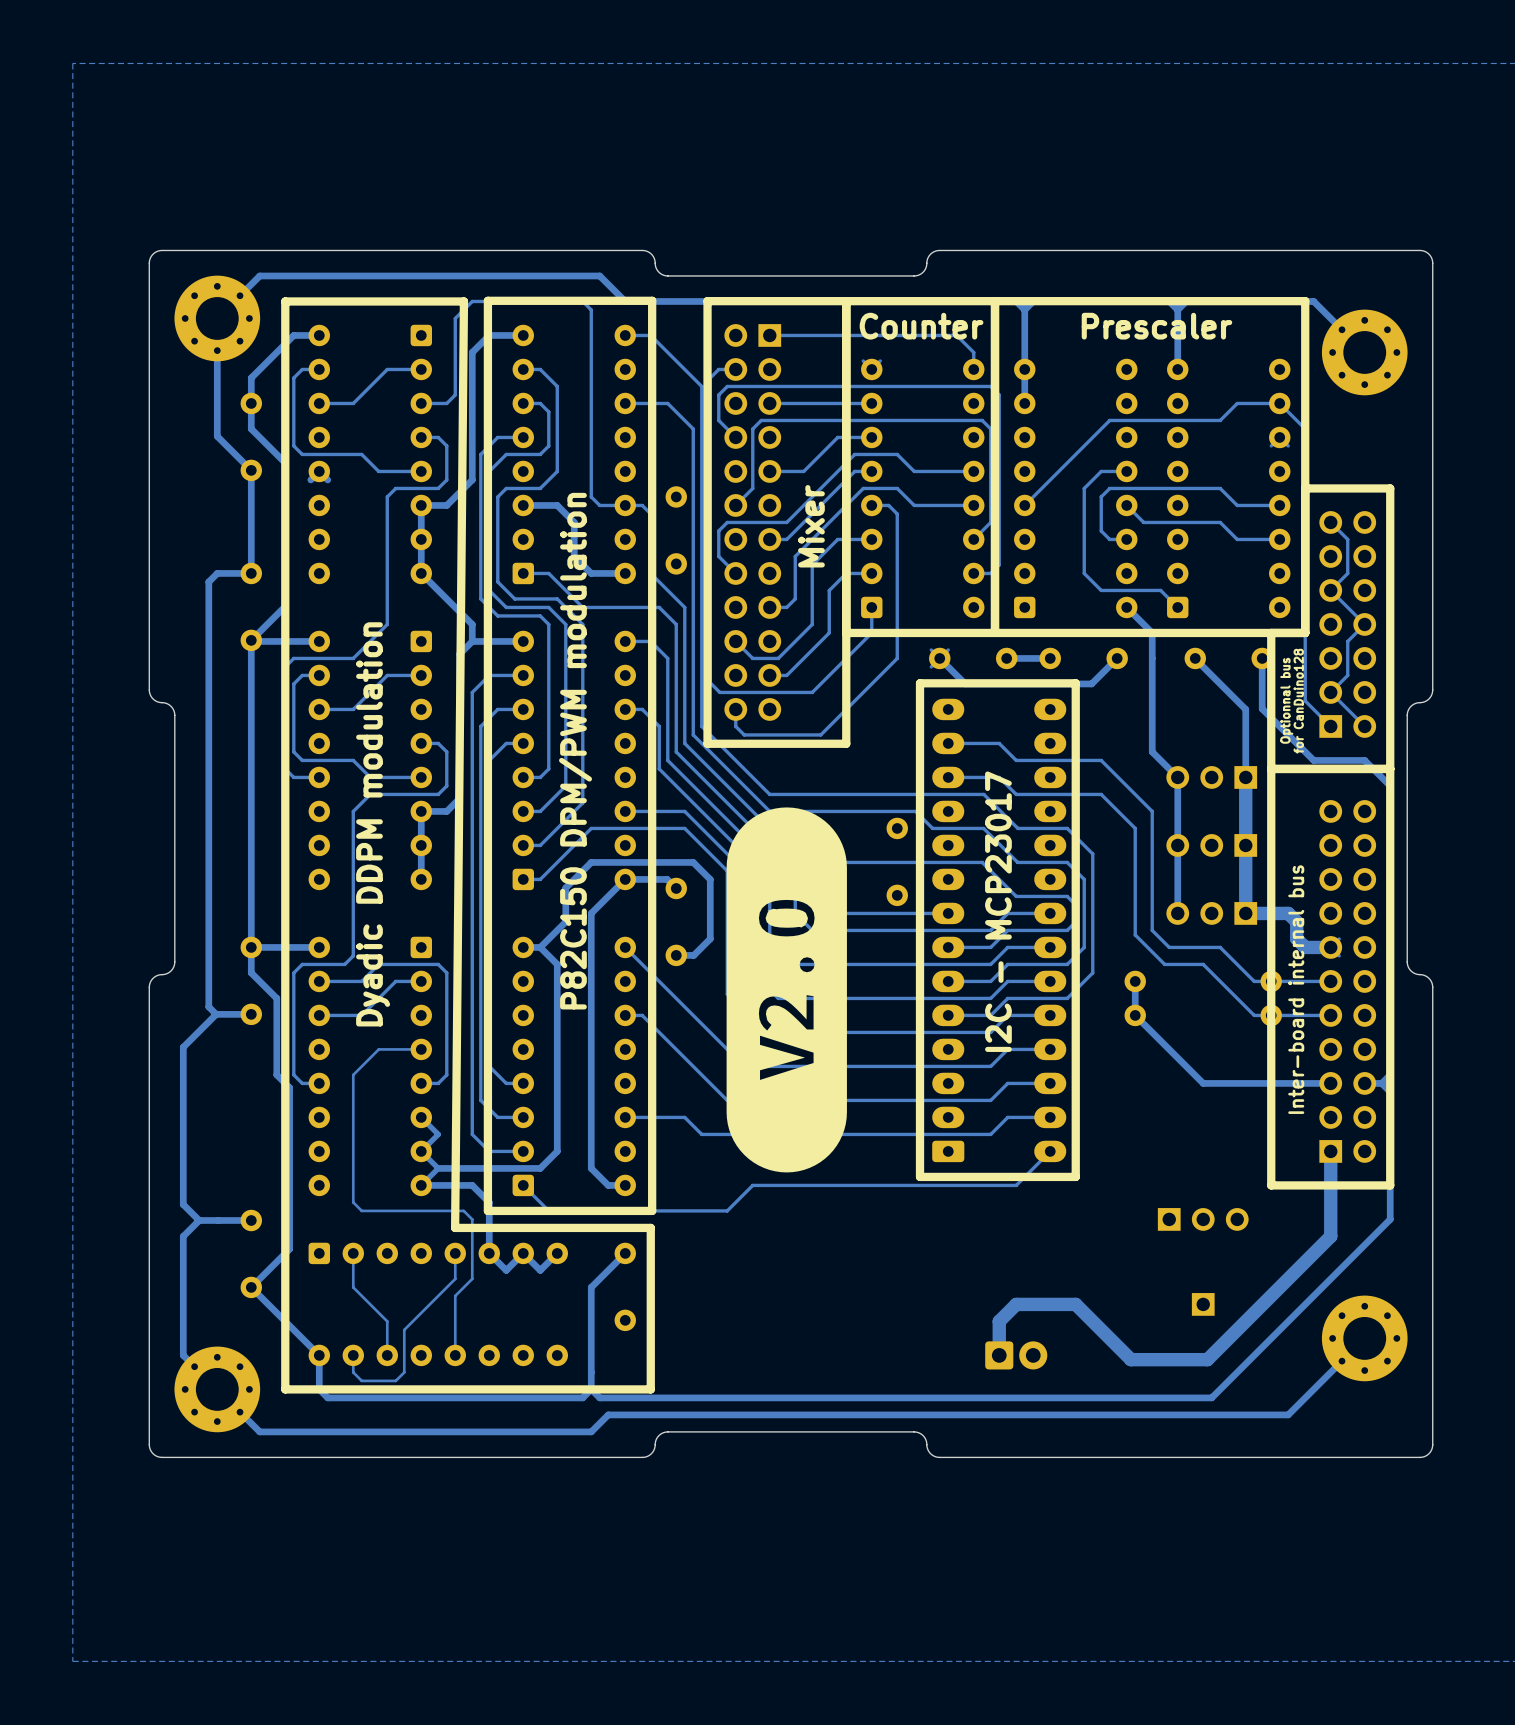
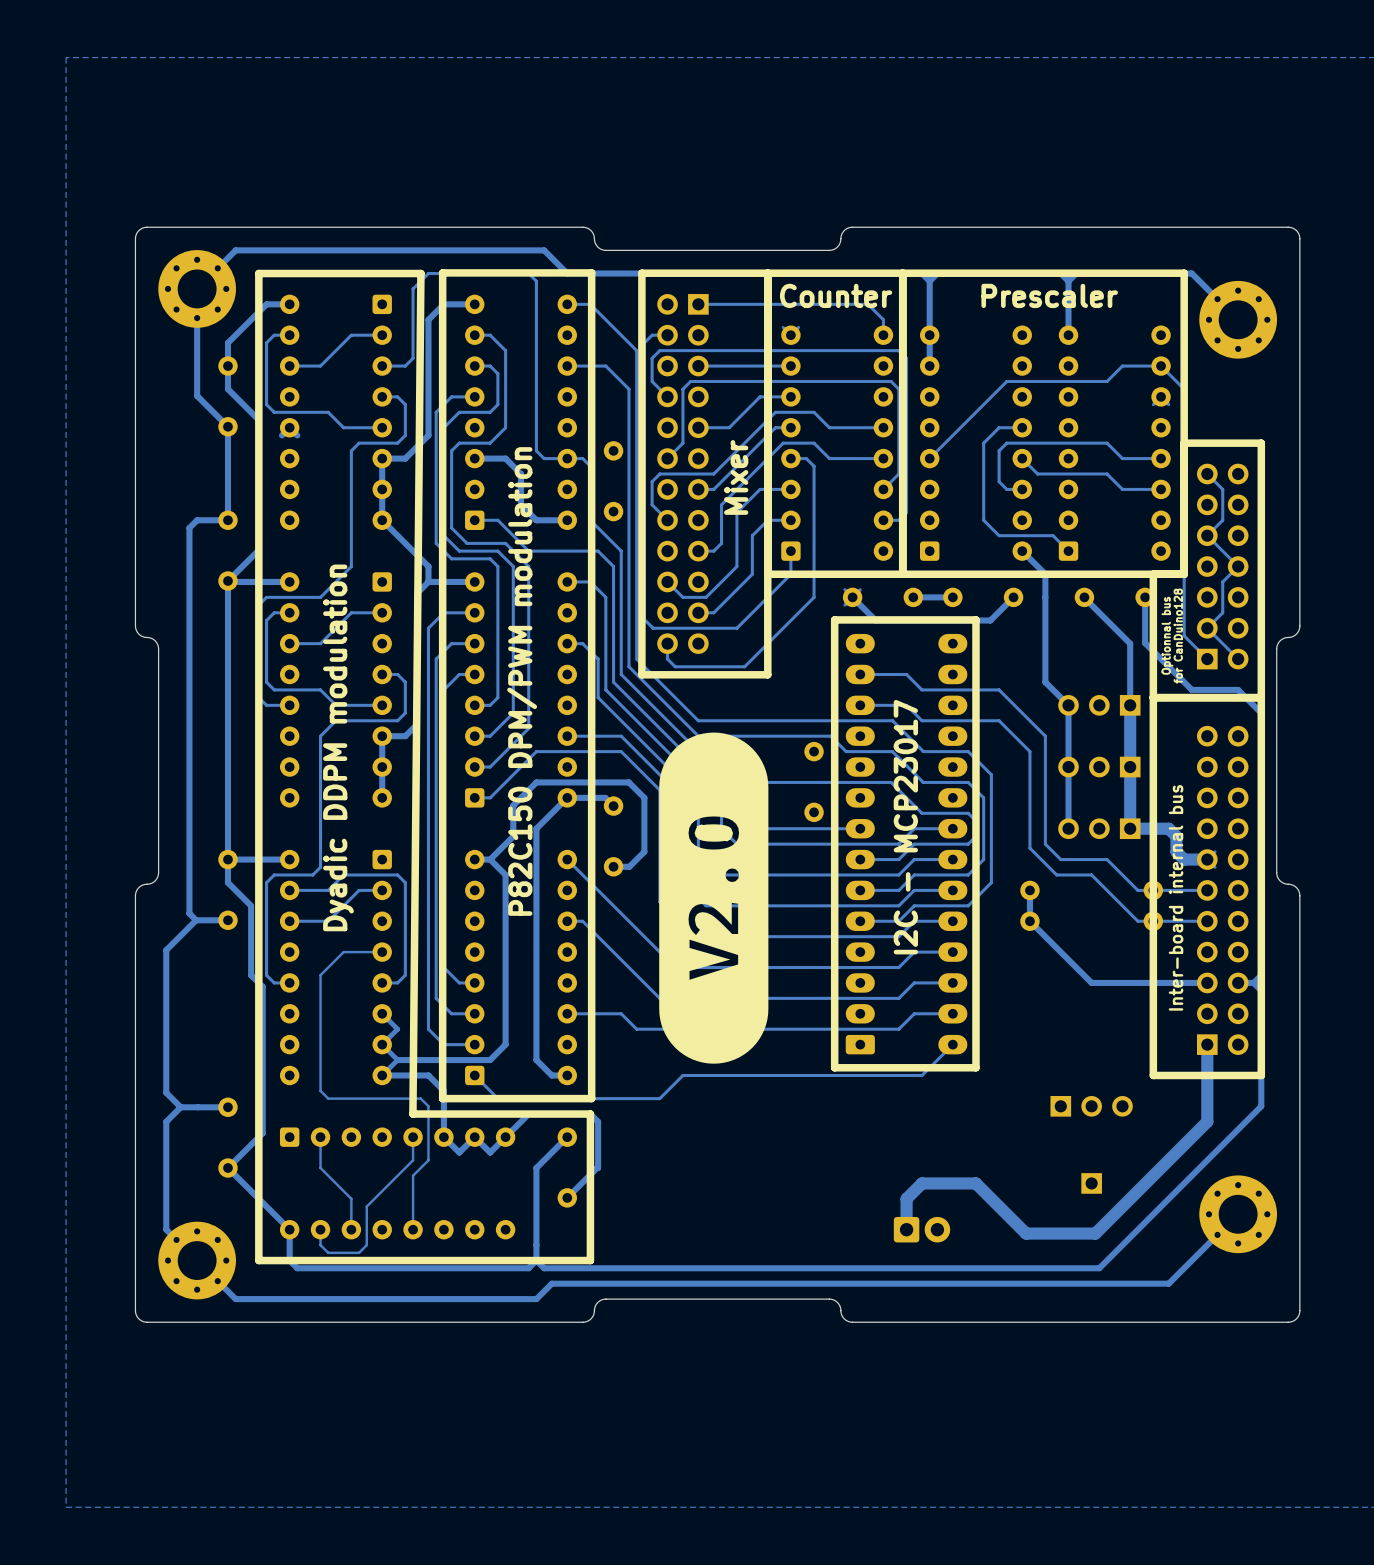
track: none -> (505, 1137) (528, 1114) (590, 1114) (598, 1121) (598, 1168) (567, 1197)

